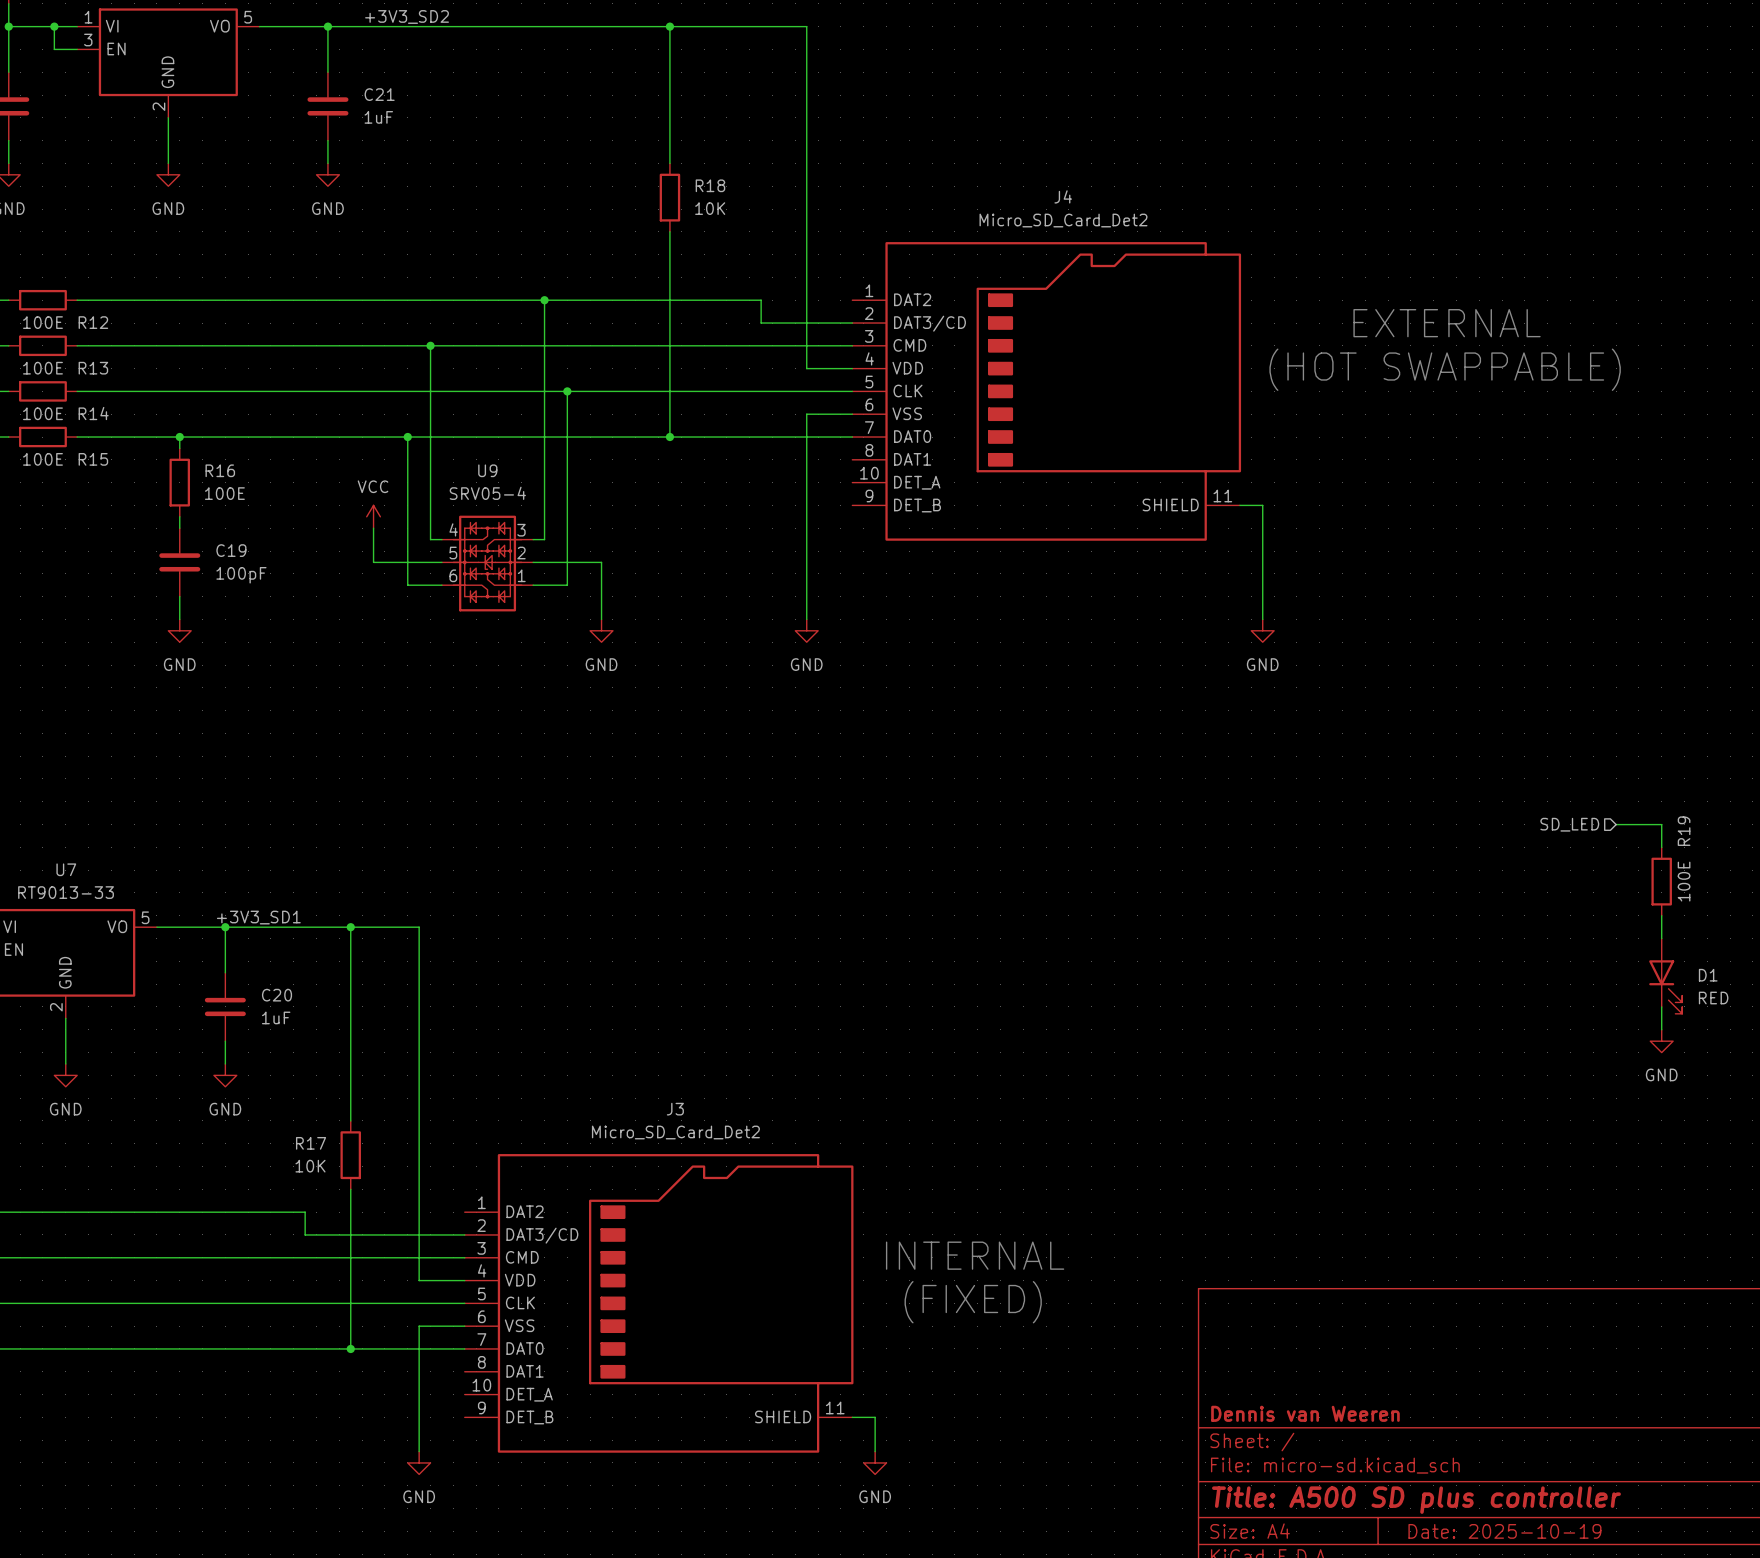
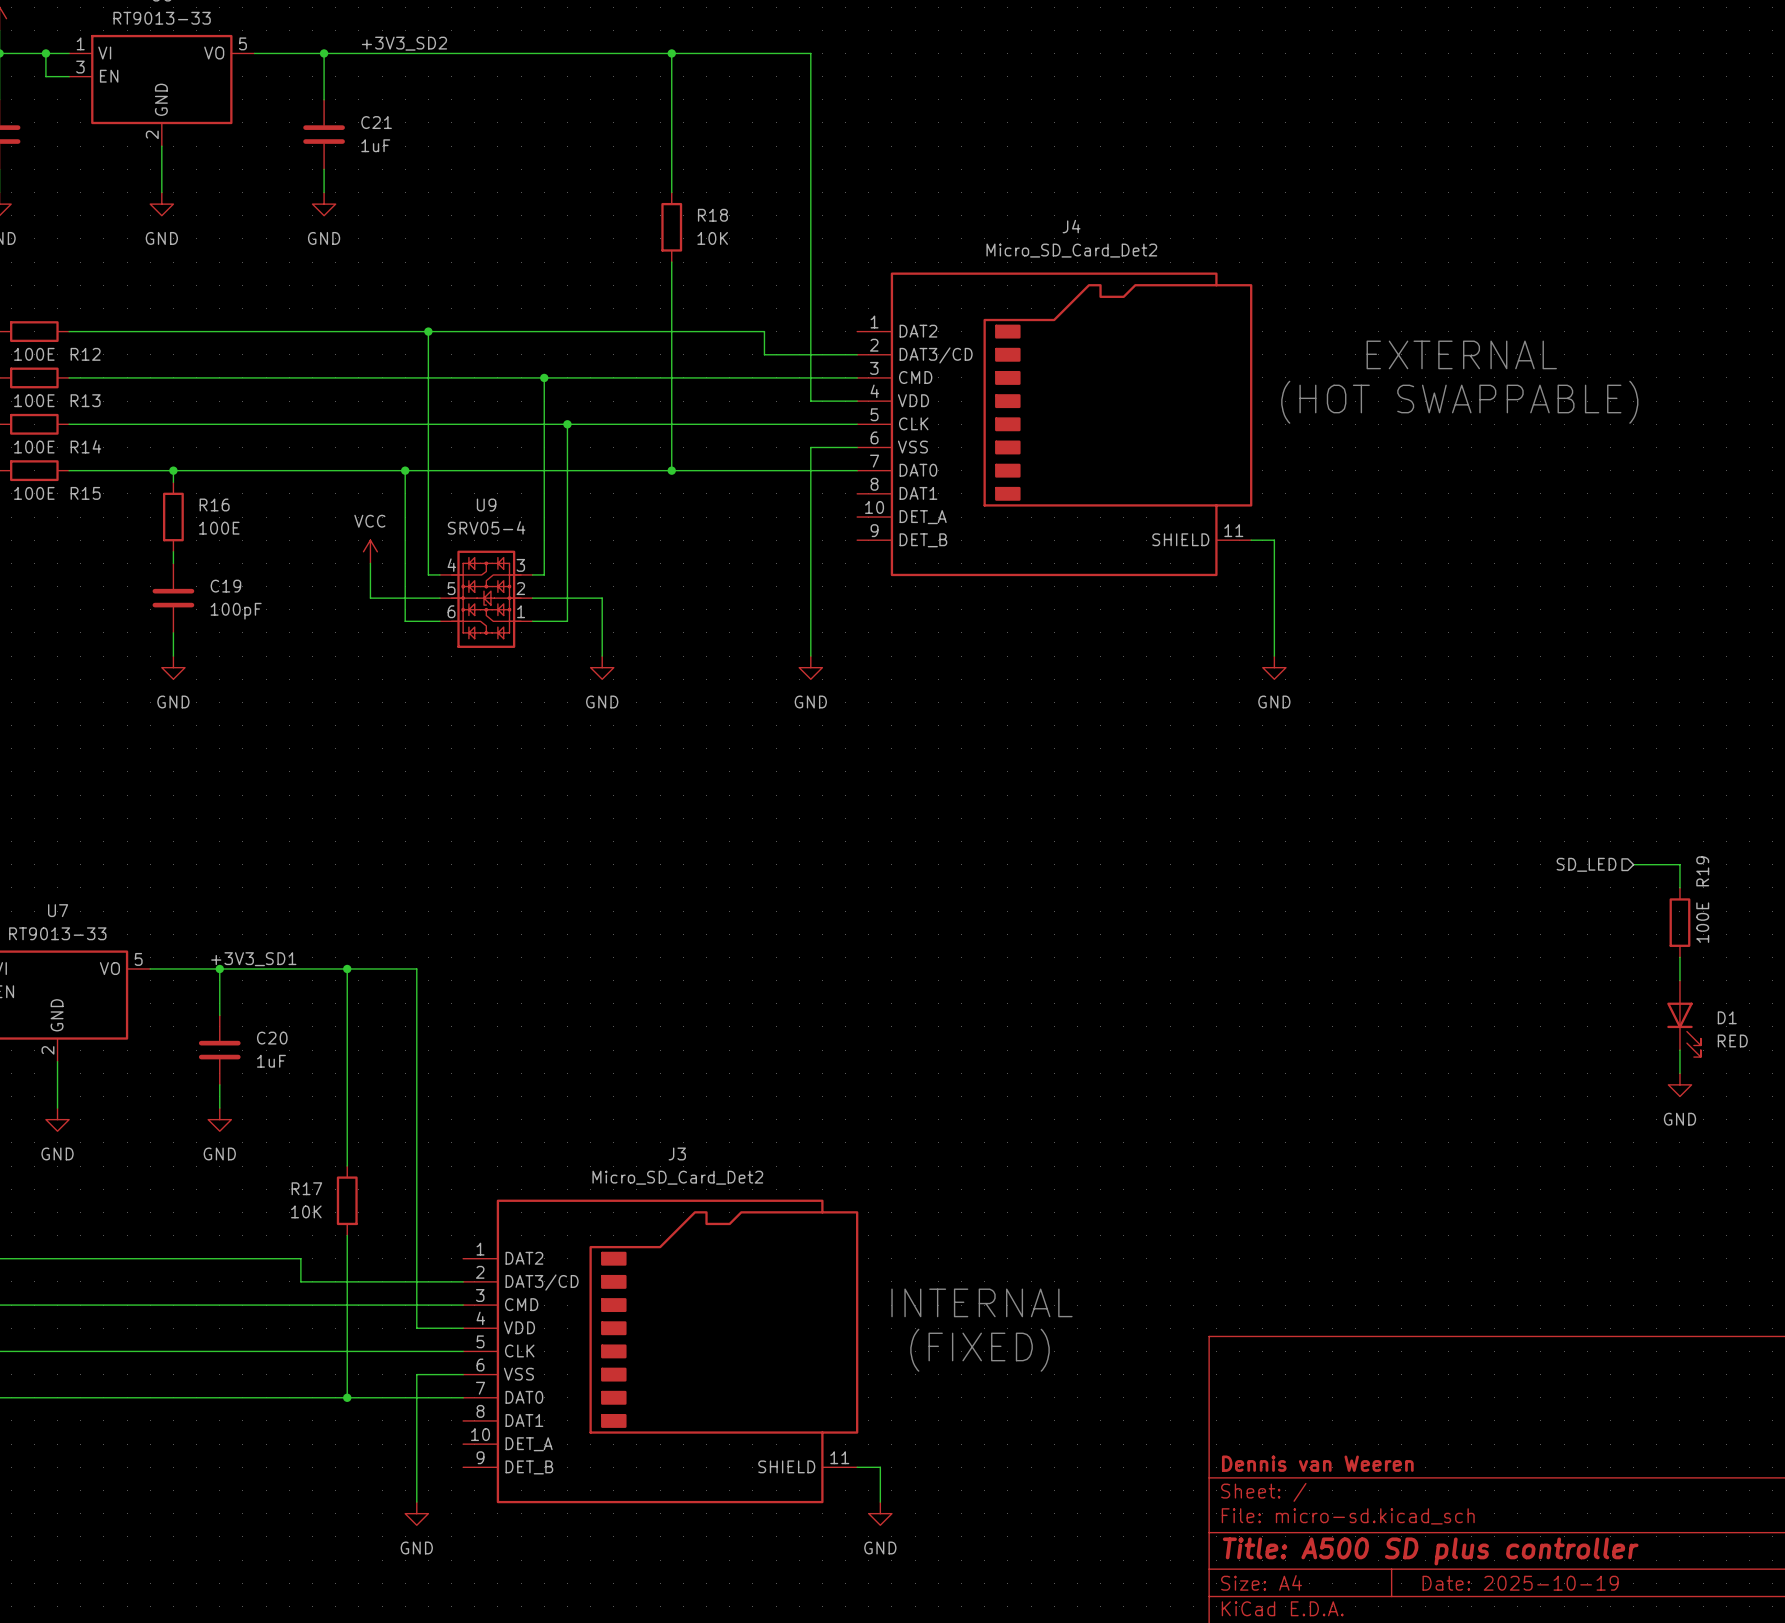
wire: (544, 300) (544, 345) -> (428, 331) (428, 377)
junction position: (544, 300) -> (544, 377)
junction position: (430, 345) -> (428, 331)

